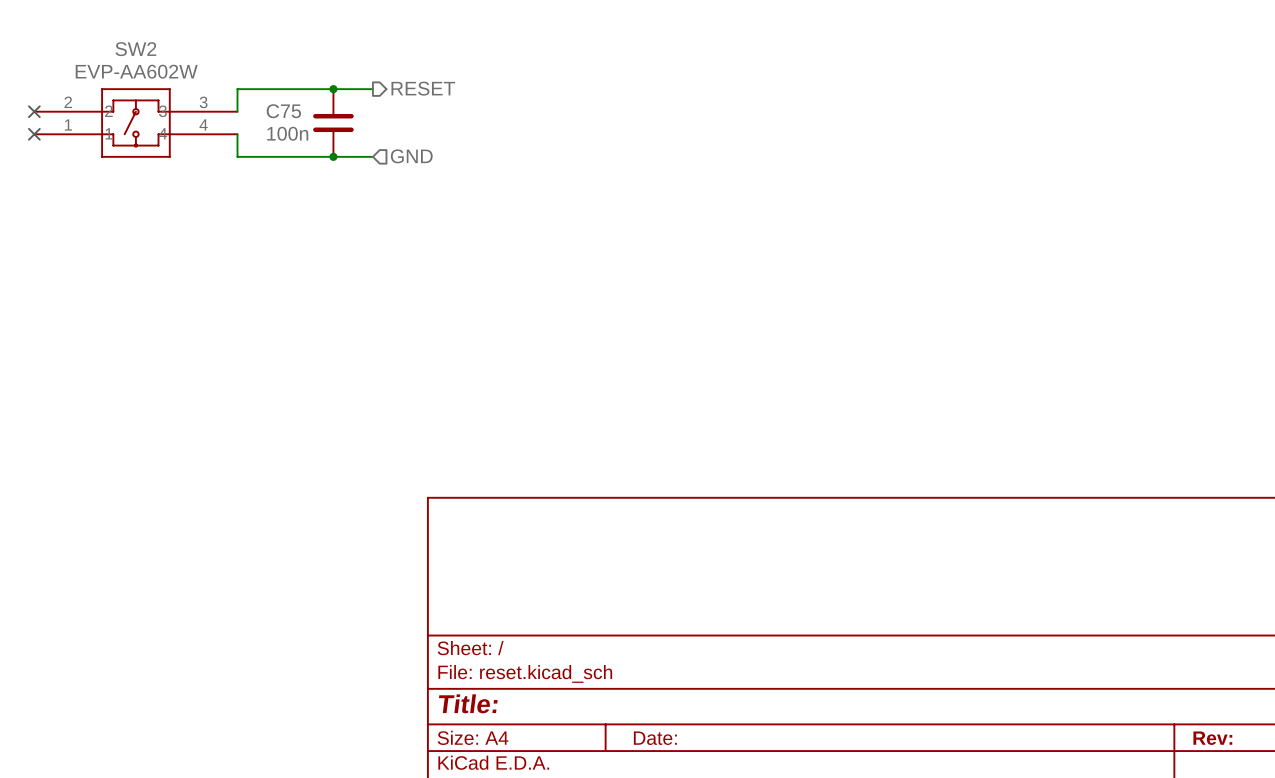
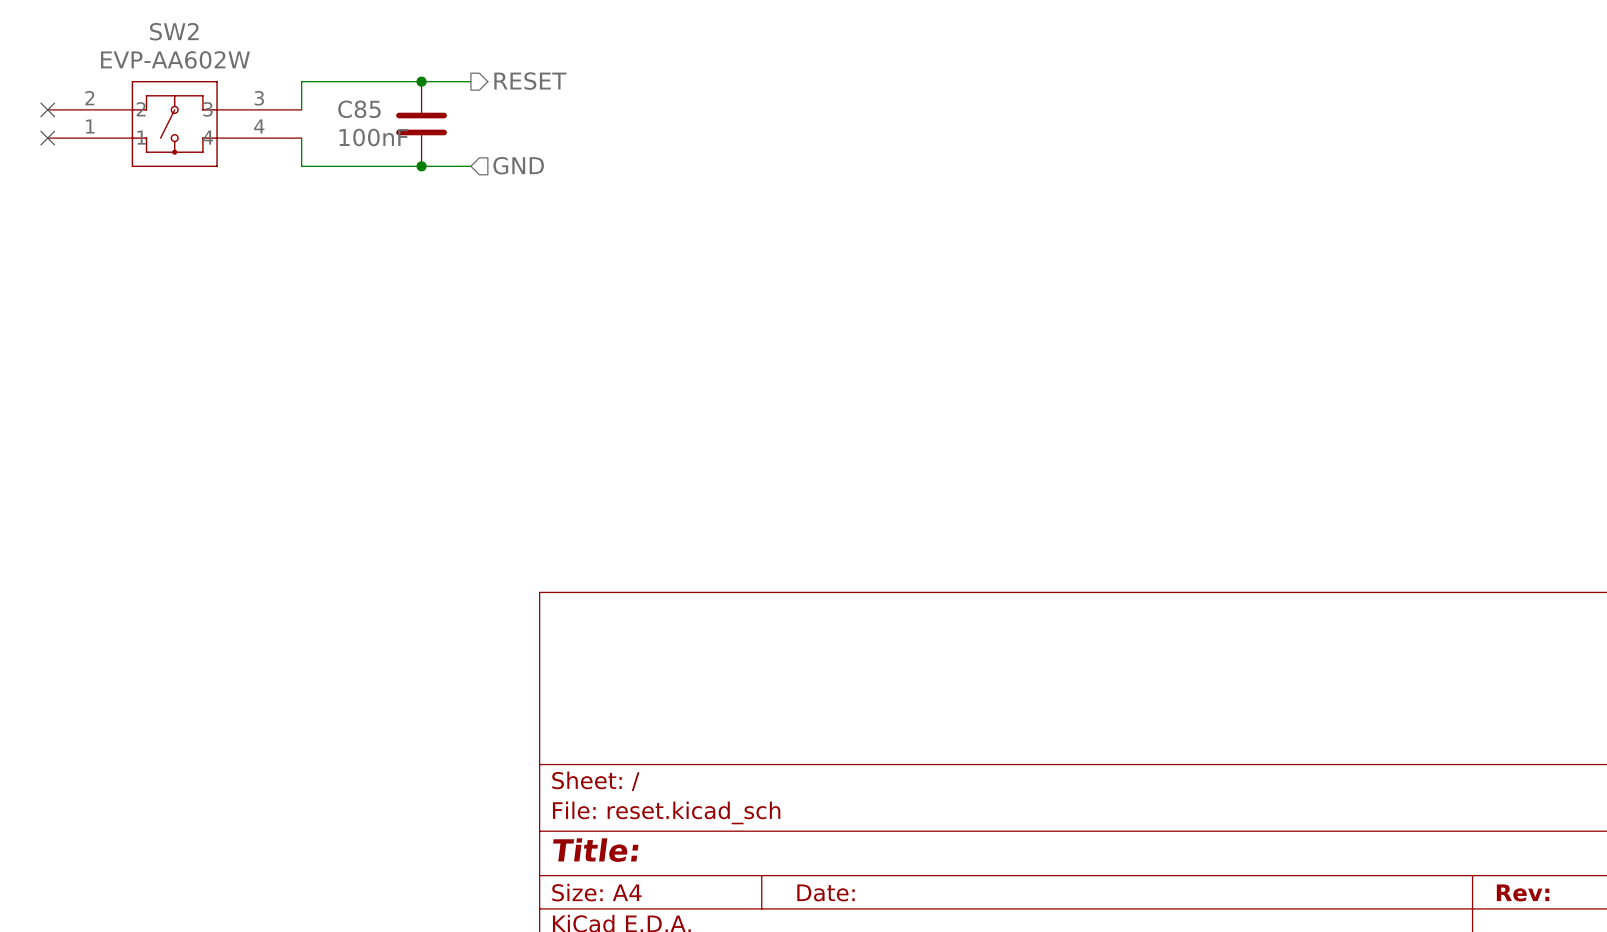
C75 name: C75 (283, 111) -> C85 (359, 109)
C75 value: 100n (287, 133) -> 100nF (373, 137)

